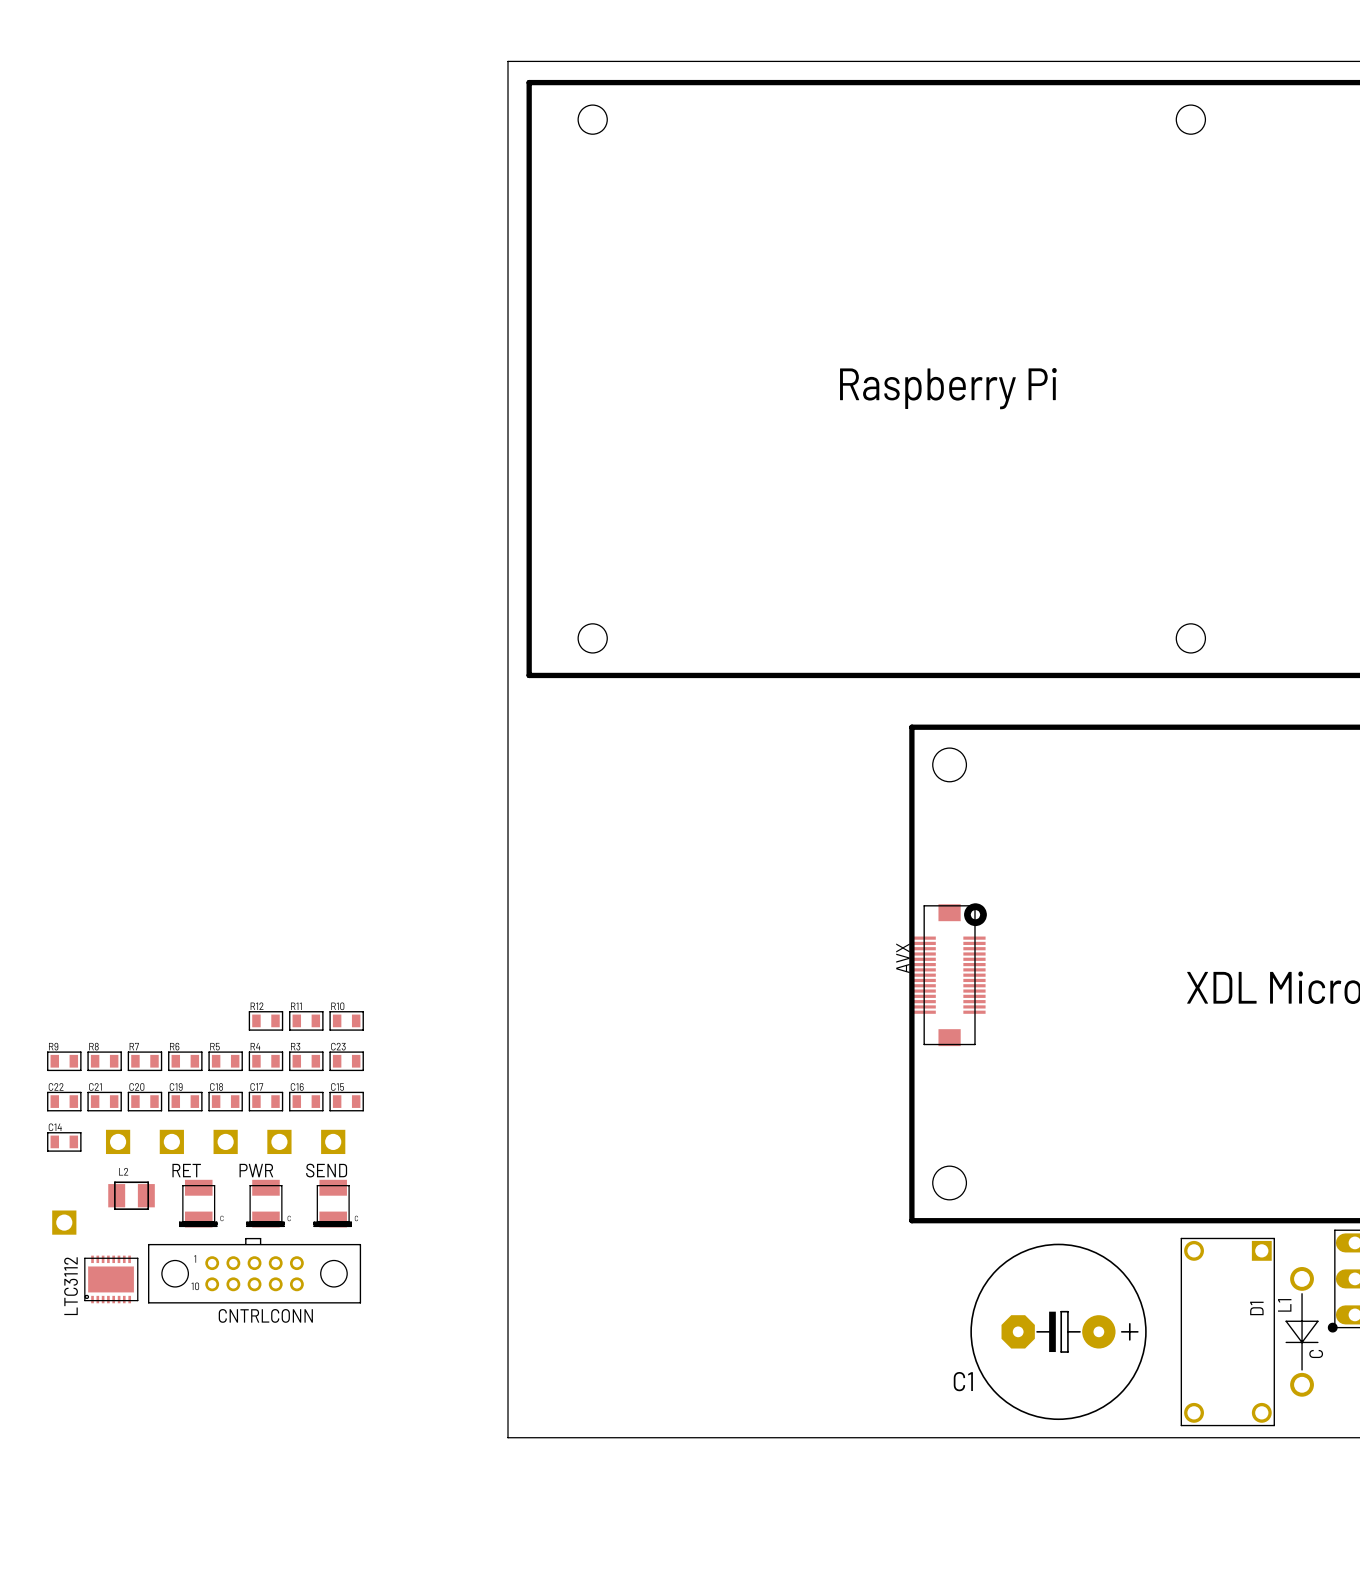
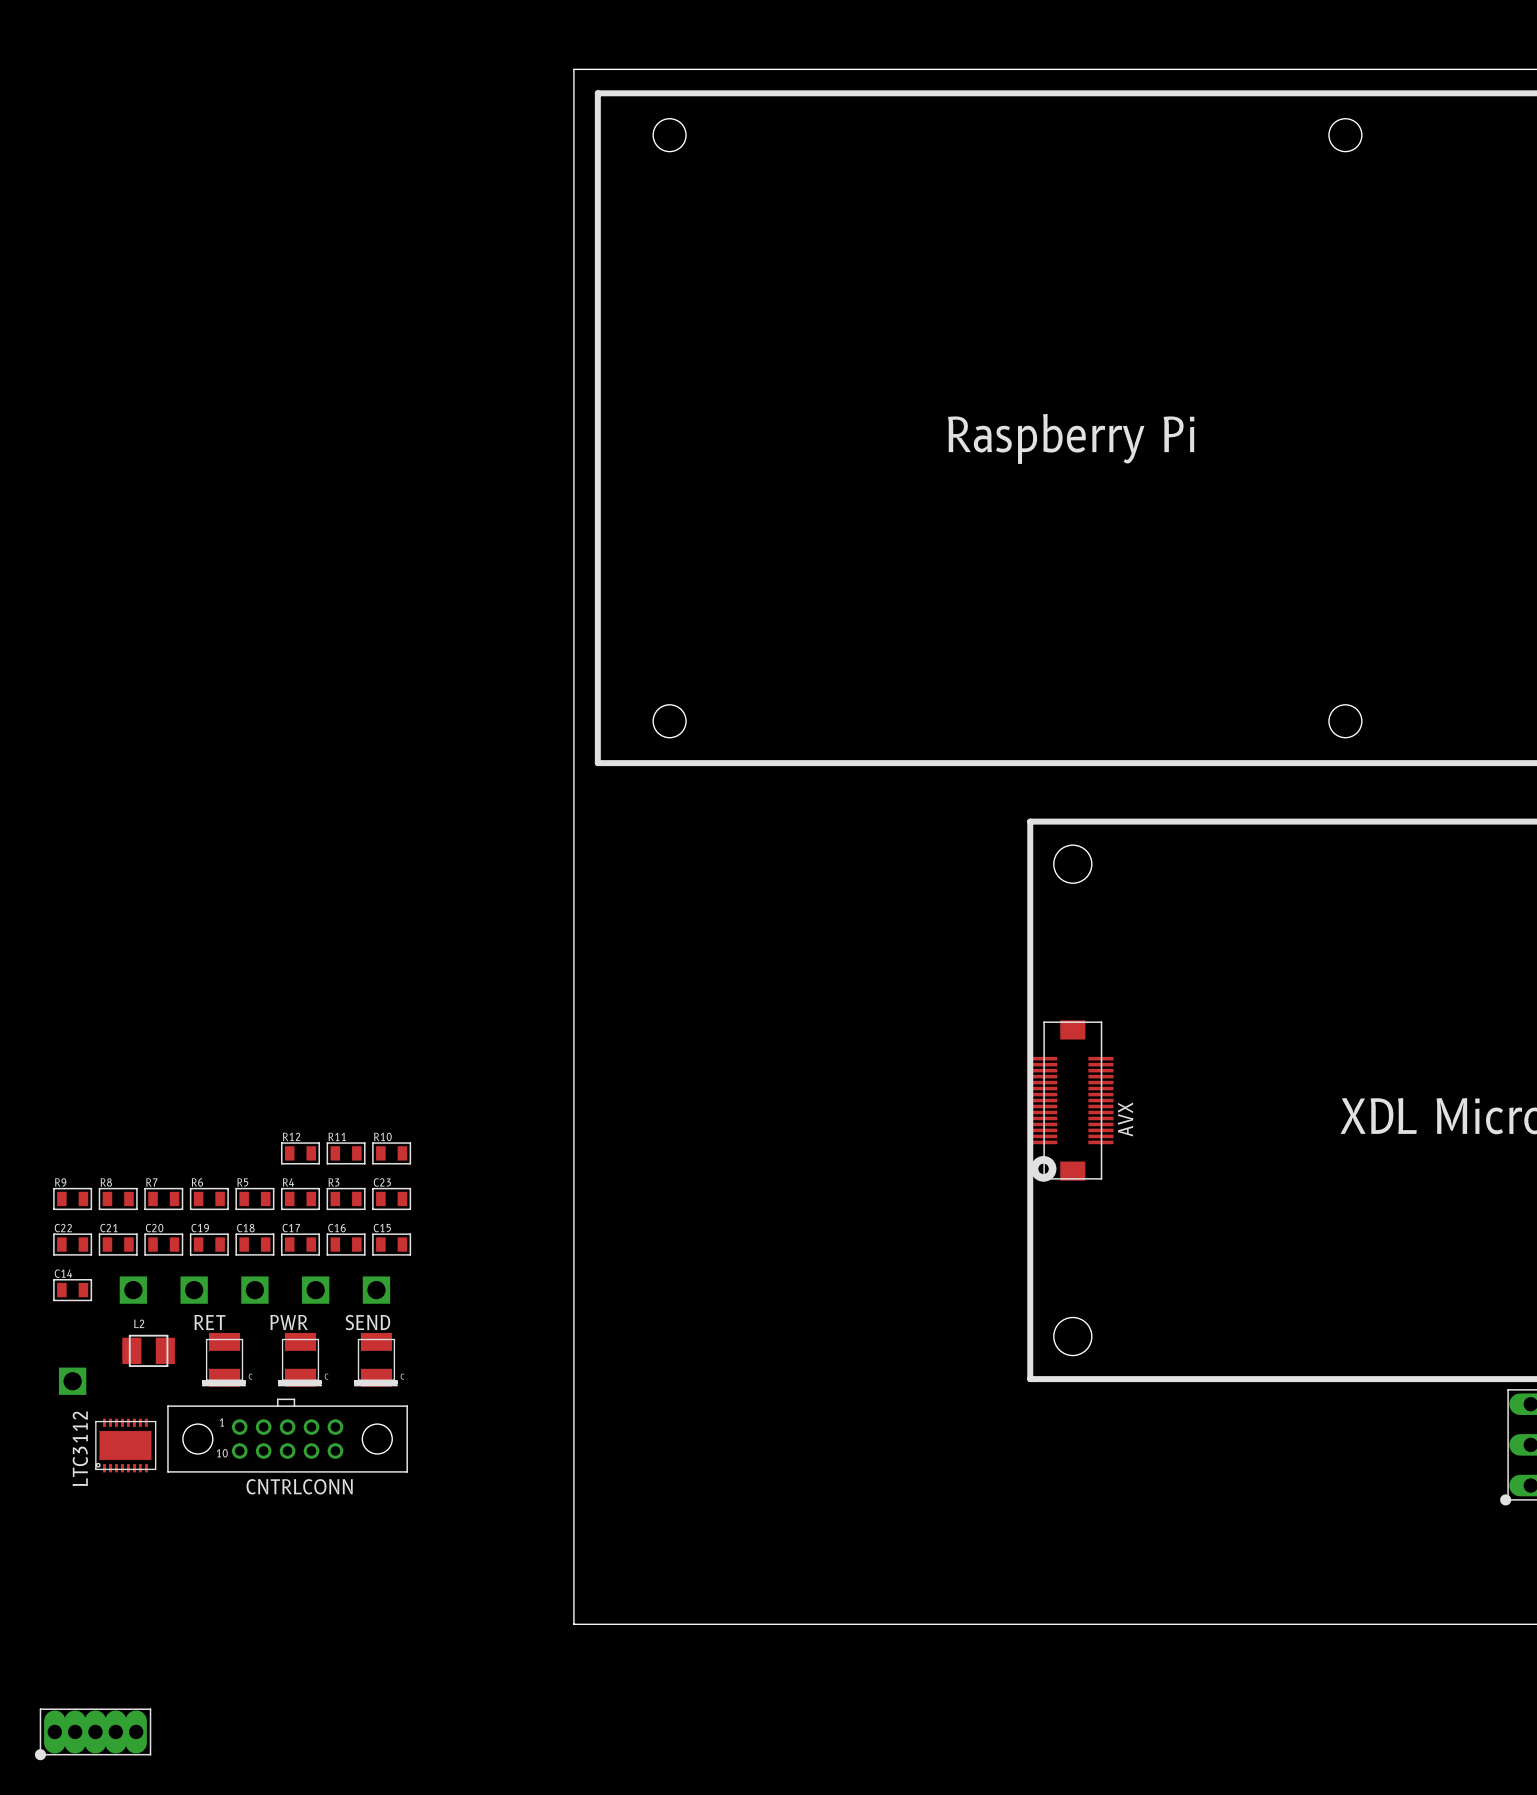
AVX rotation: 0° (950, 974) -> 180° (1072, 1101)
C1: (1058, 1331) -> none
D1: (1302, 1331) -> none
L1: (1227, 1332) -> none
part: none -> (93, 1734)

